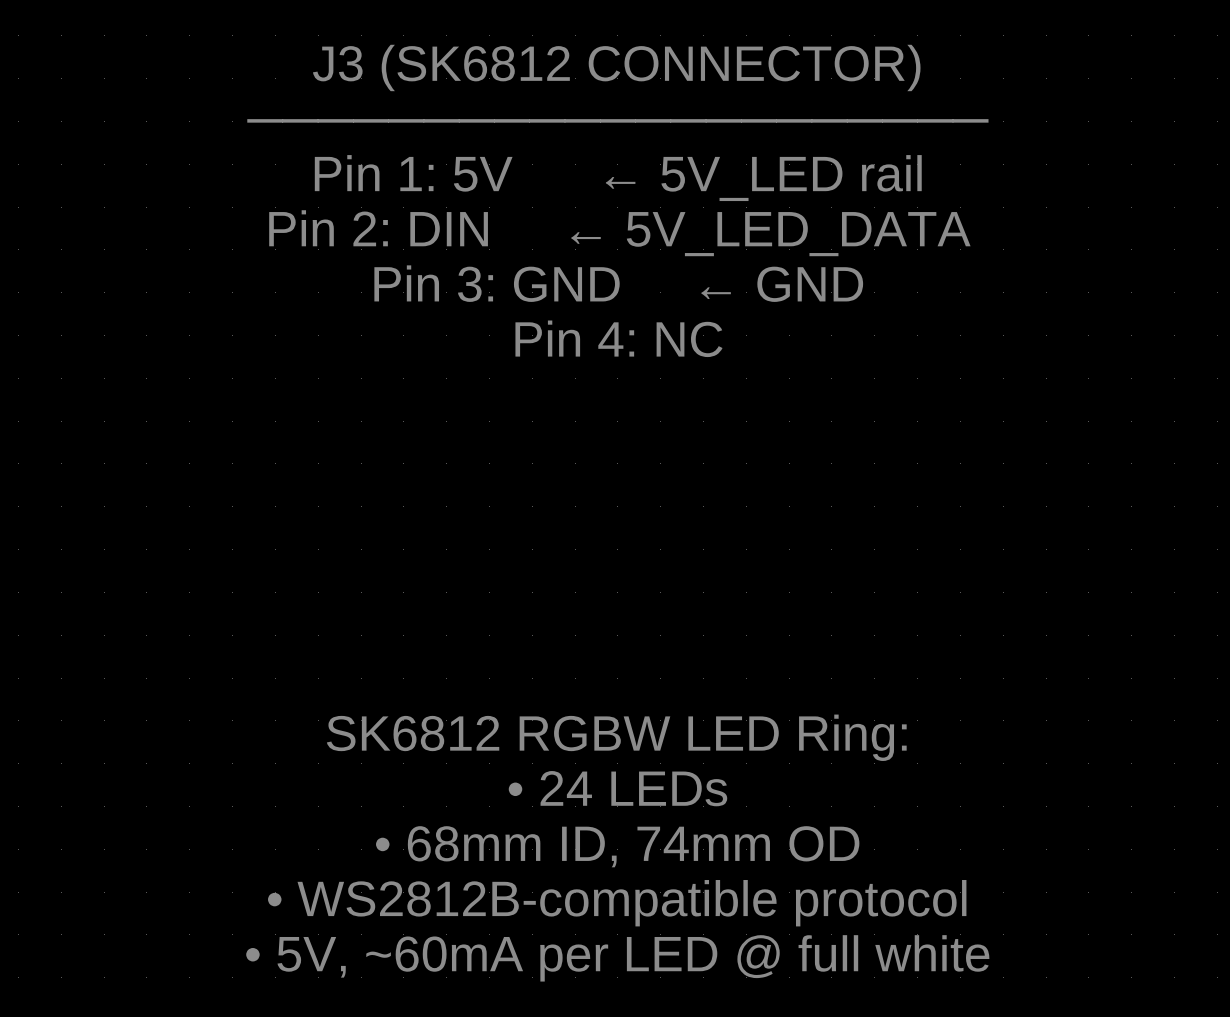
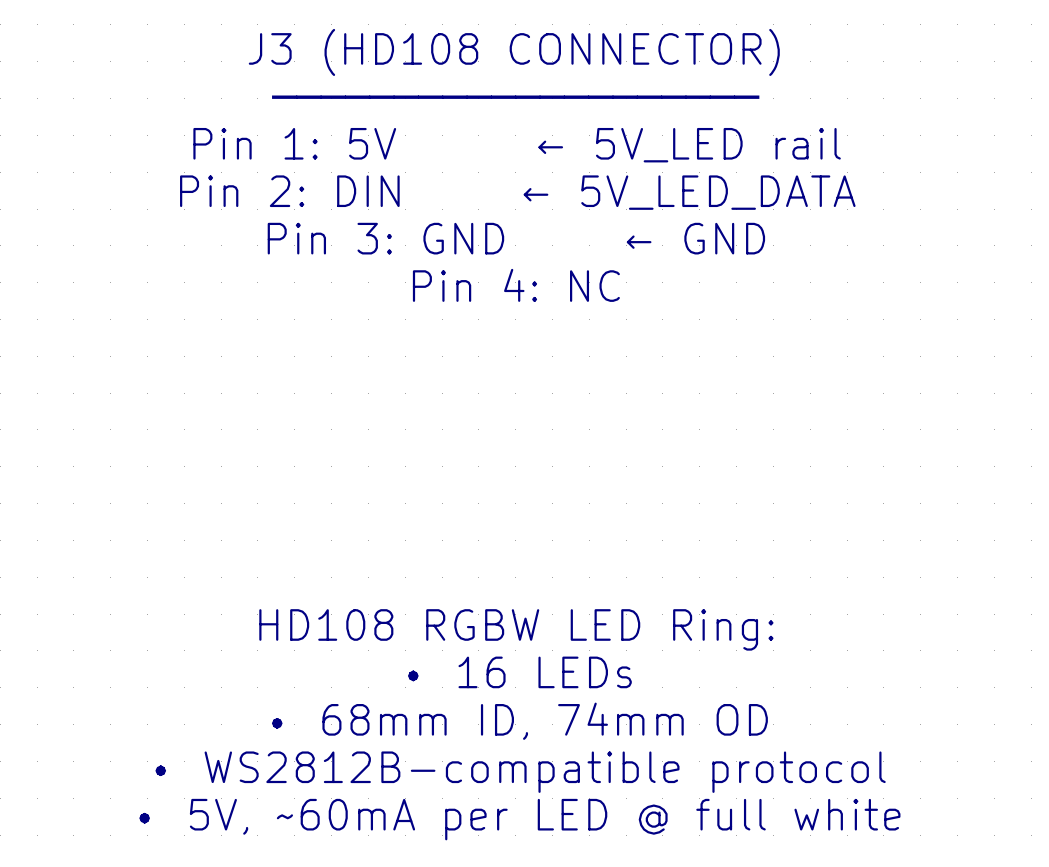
text: J3 (SK6812 CONNECTOR) (616, 67) -> J3 (HD108 CONNECTOR) (514, 52)
text: ───────────────────── (617, 120) -> ──────────────────── (515, 97)
text: SK6812 RGBW LED Ring: (616, 737) -> HD108 RGBW LED Ring: (516, 629)
text: • 24 LEDs (617, 788) -> • 16 LEDs (519, 672)

